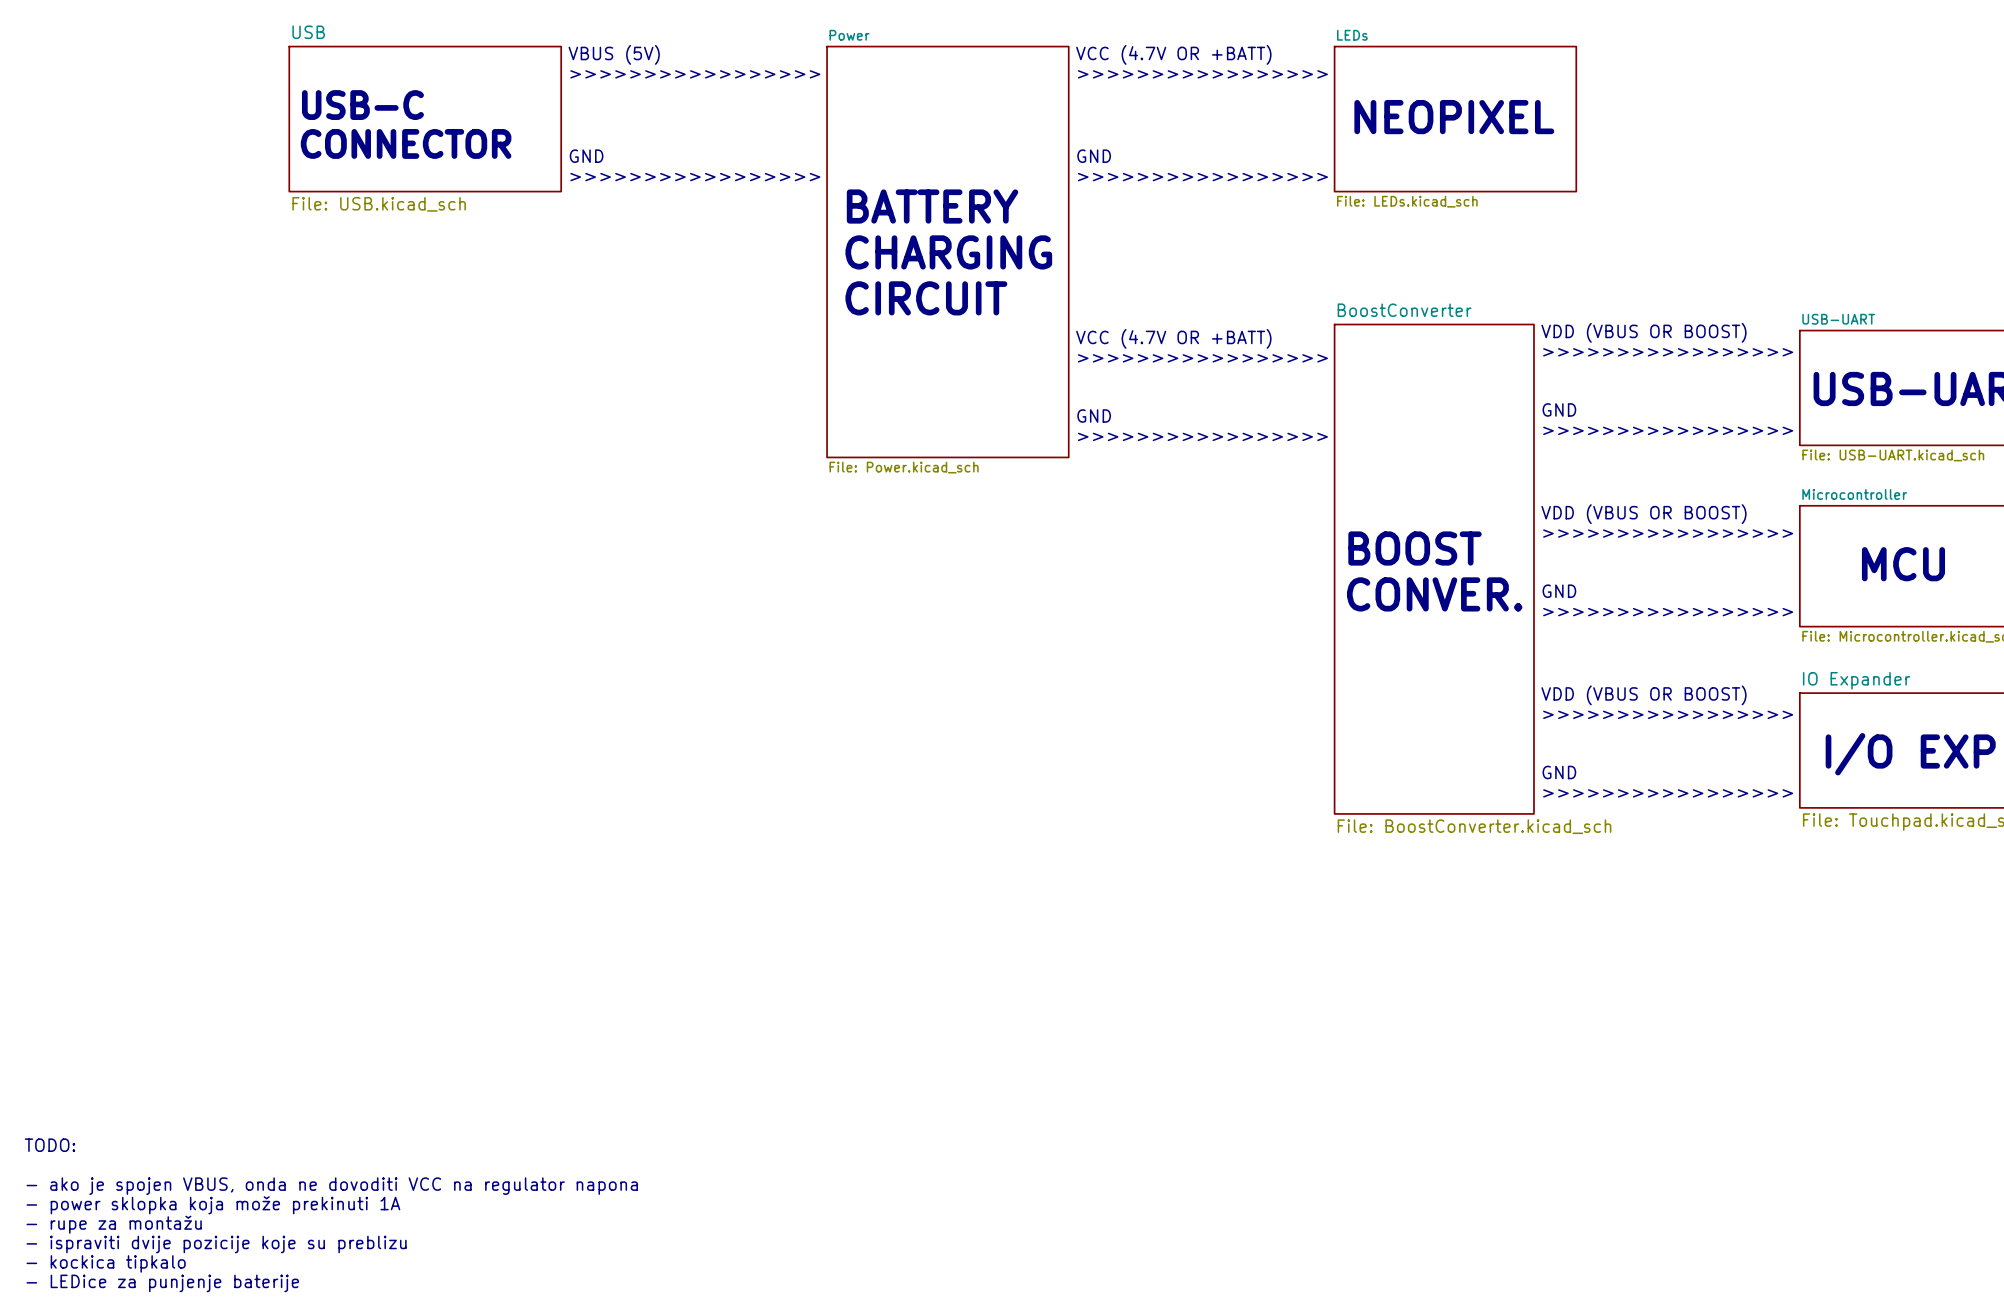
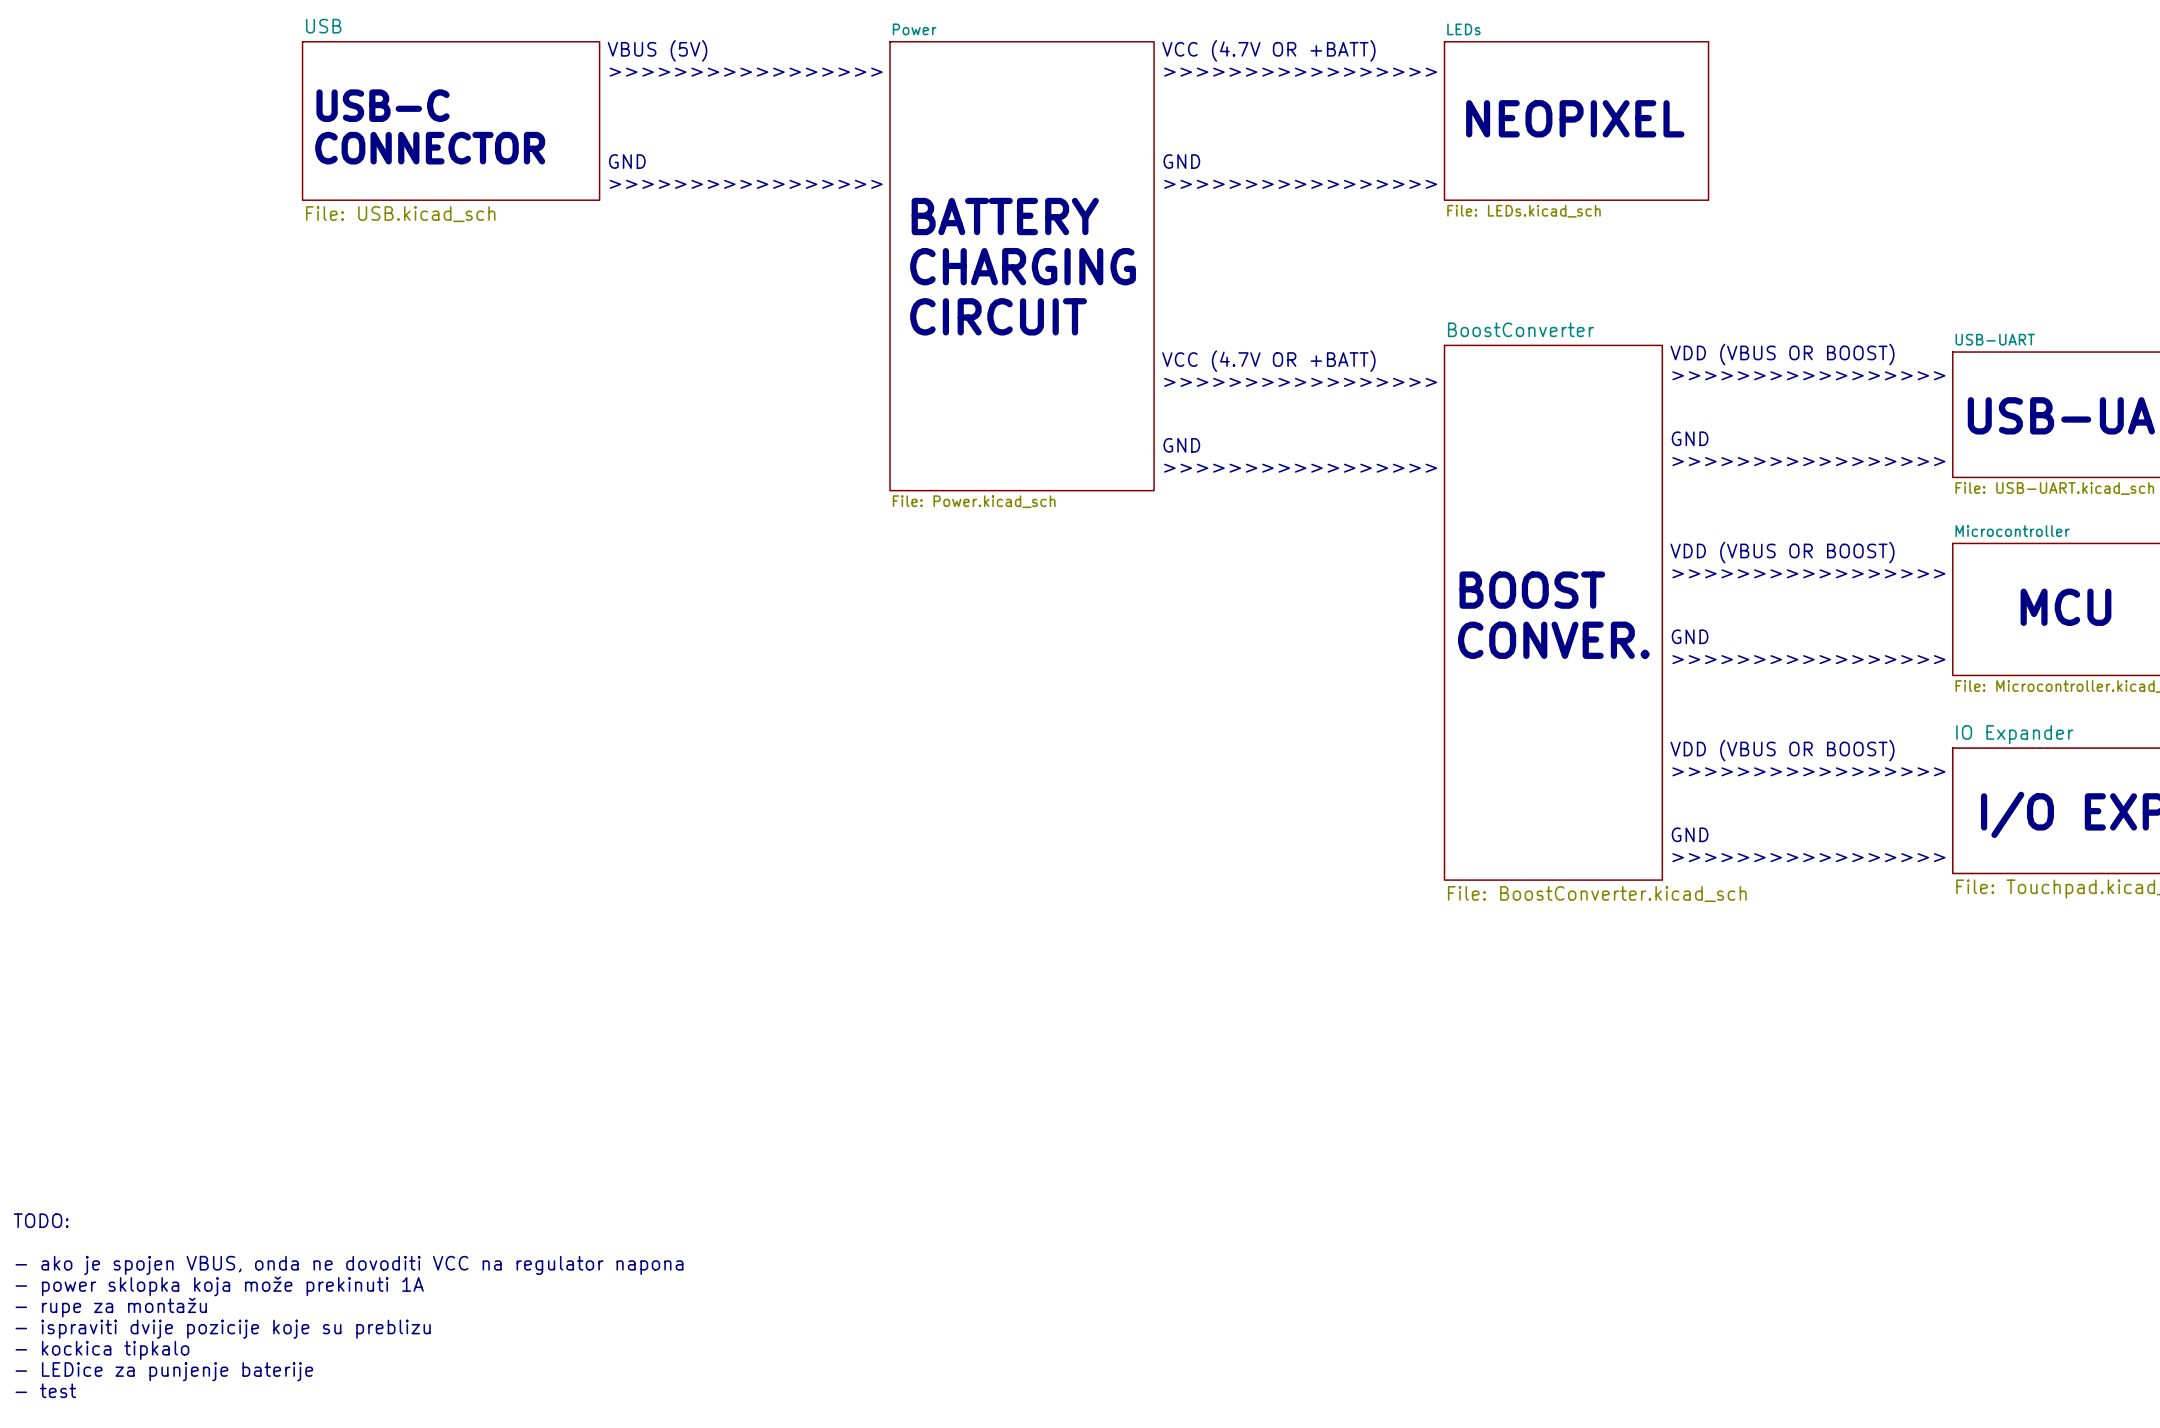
text position: TODO: (49, 1145) -> TODO: (41, 1220)
text: none -> - ako je spojen VBUS, onda ne dovoditi VCC na regulator napona (349, 1265)
text: - ako je spojen VBUS, onda ne dovoditi VCC na regulator napona (332, 1186) -> - power sklopka koja može prekinuti 1A (219, 1286)
text: - power sklopka koja može prekinuti 1A (213, 1205) -> - rupe za montažu (111, 1307)
text: - rupe za montažu (114, 1224) -> - ispraviti dvije pozicije koje su preblizu (223, 1329)
text: - ispraviti dvije pozicije koje su preblizu (216, 1244) -> - kockica tipkalo (102, 1350)
text: - kockica tipkalo (106, 1263) -> - LEDice za punjenje baterije (164, 1371)
text: - LEDice za punjenje baterije (162, 1283) -> - test (45, 1390)

